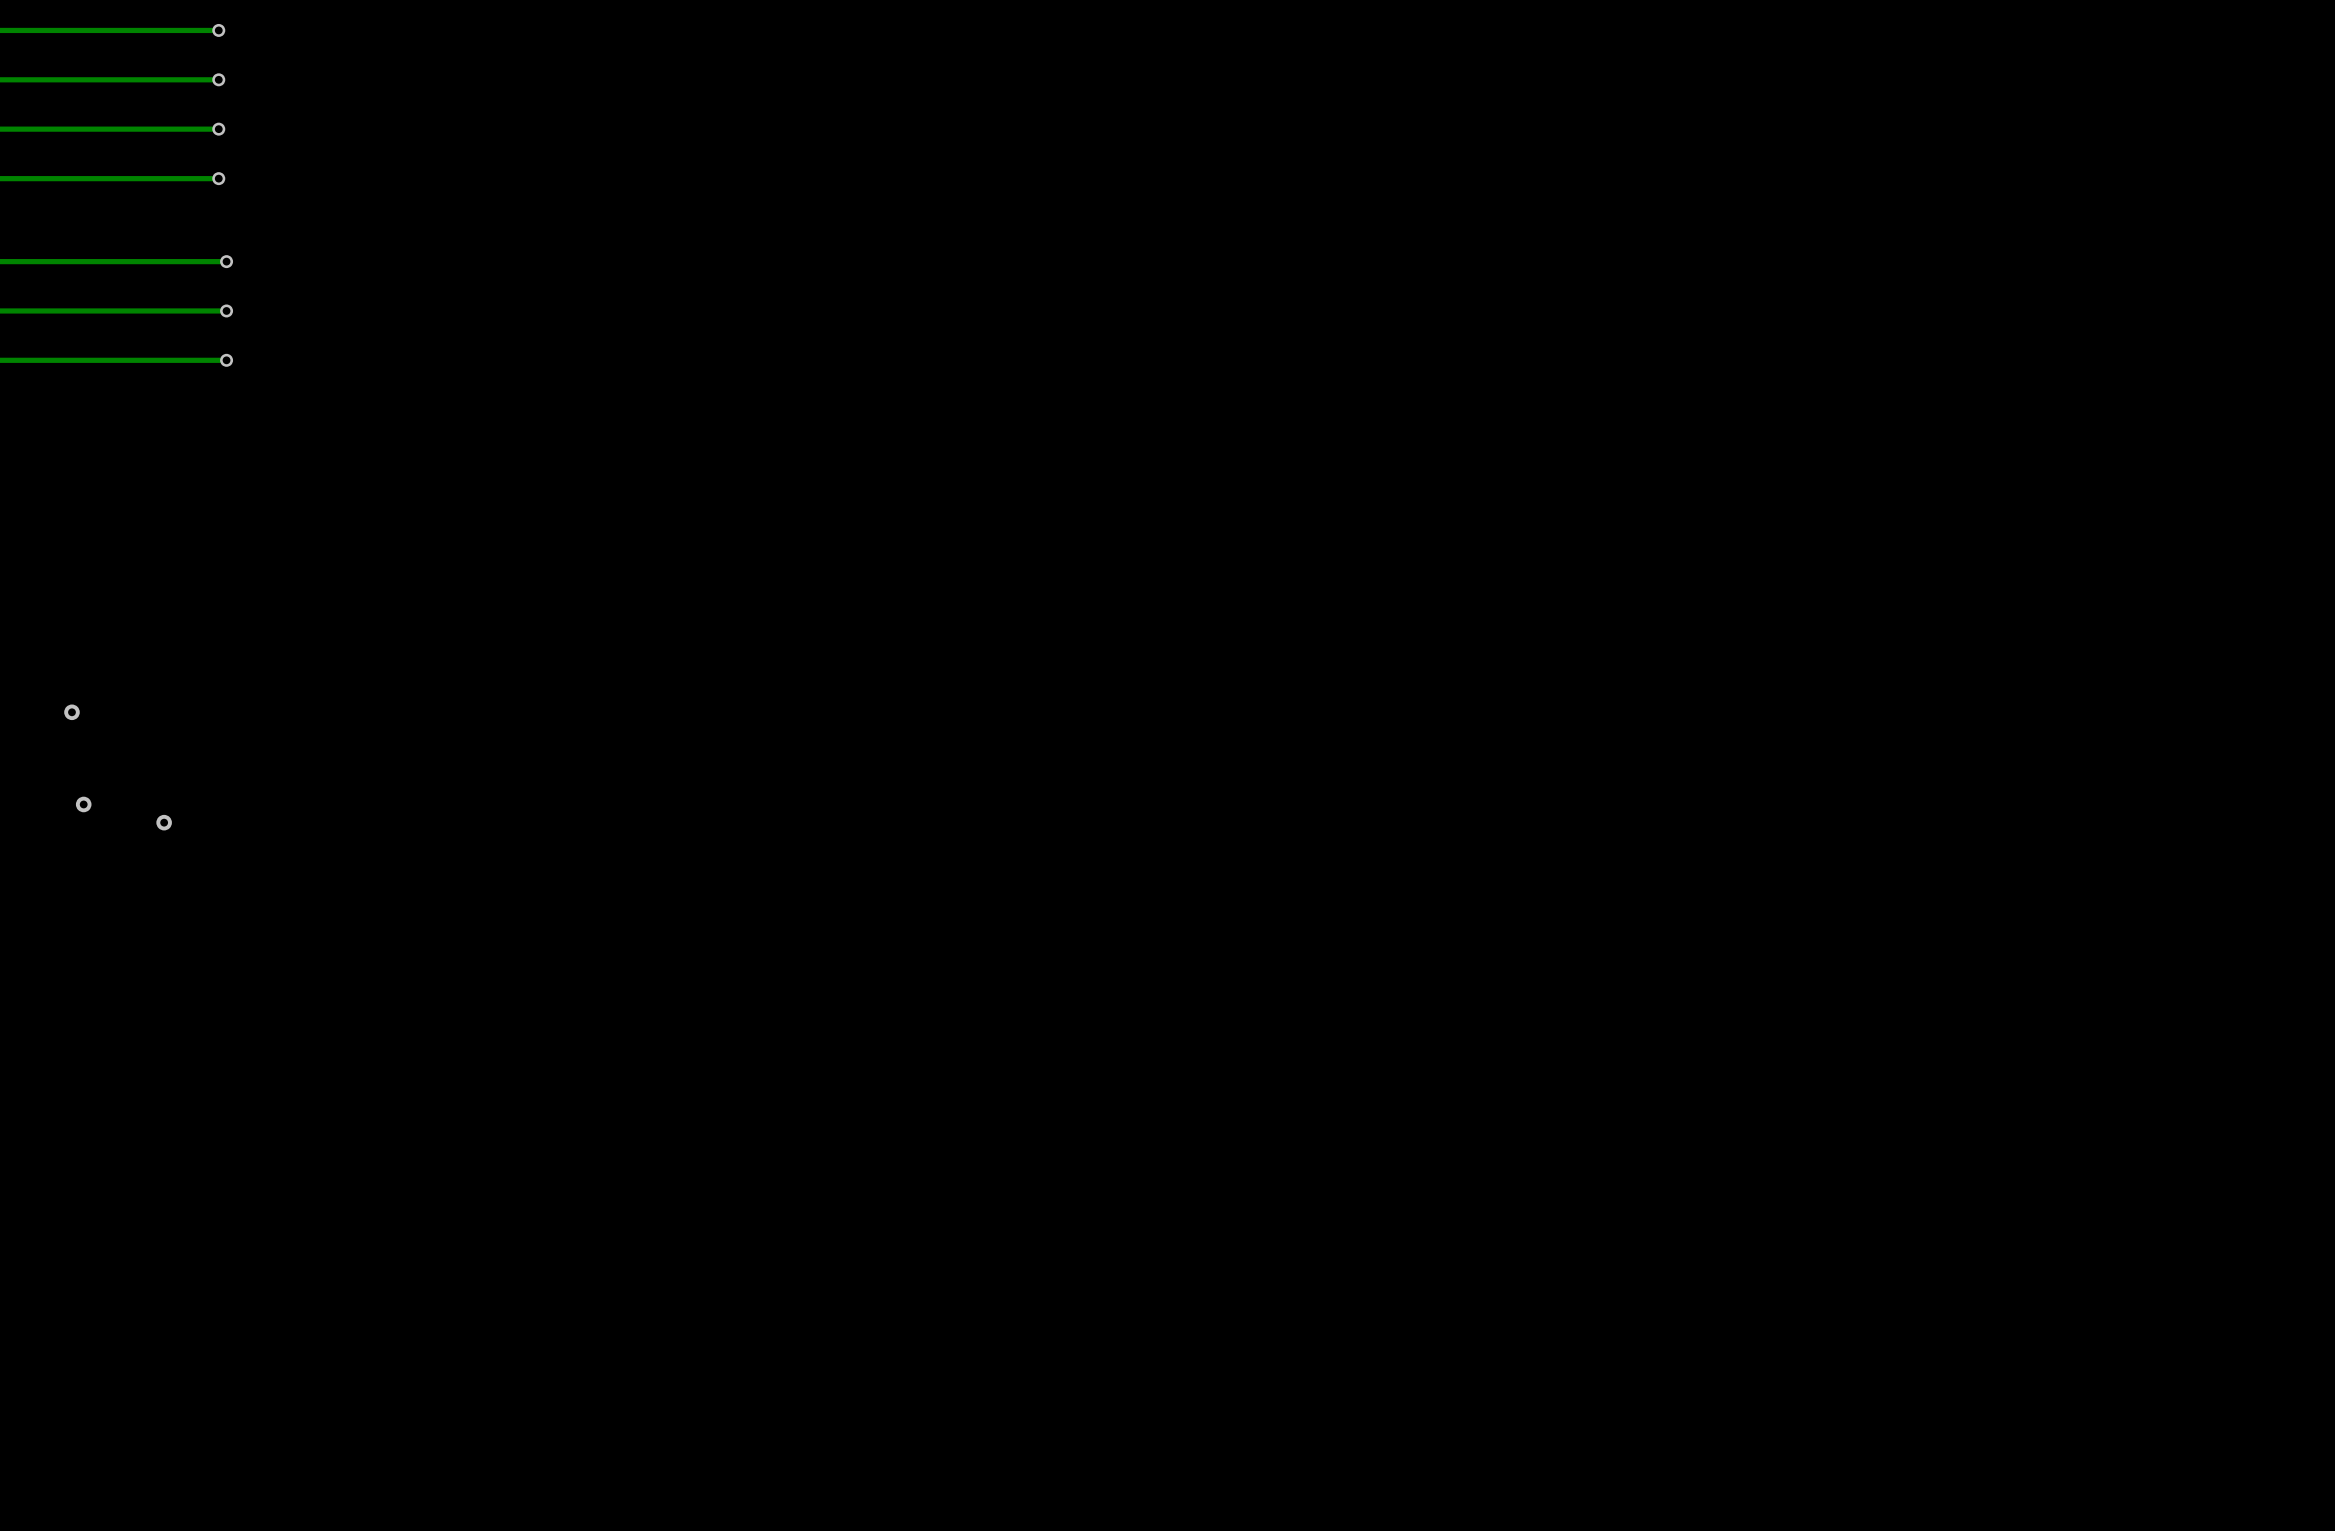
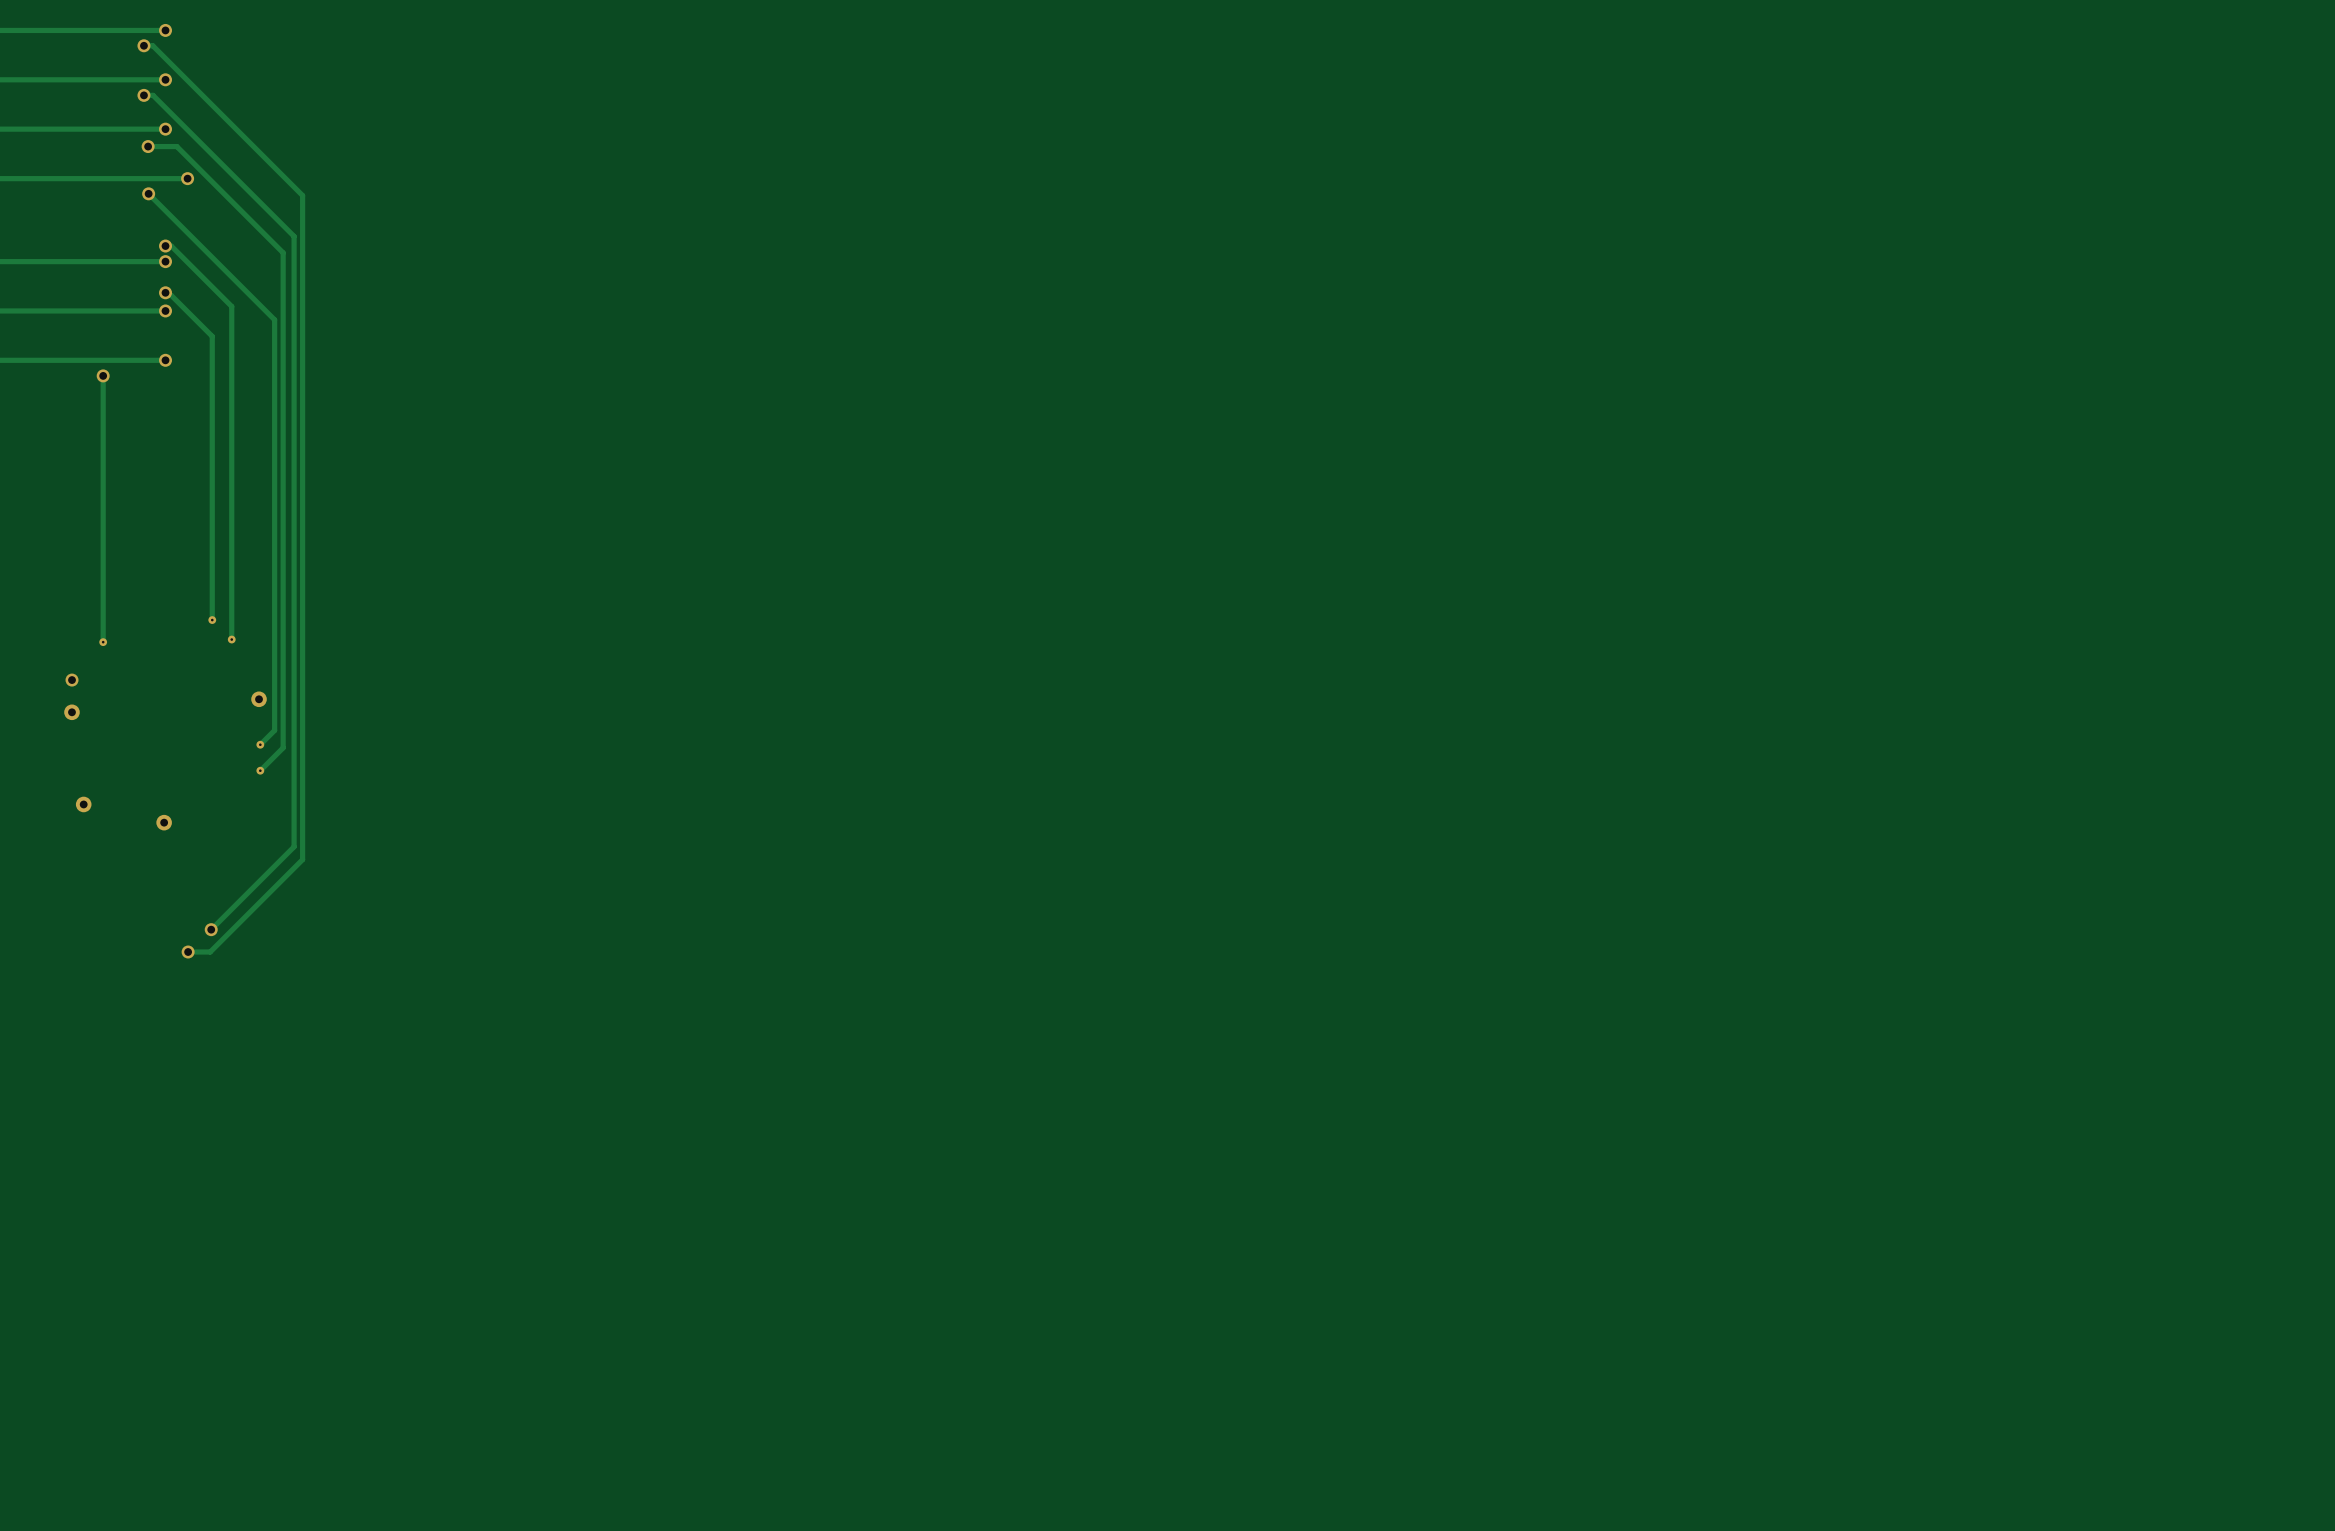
via: none -> (165, 30)
track: (218, 30) (165, 30) -> none
via: (218, 30) -> none
track: none -> (143, 45) (152, 45) (302, 195) (302, 859) (210, 952) (188, 952)
via: none -> (143, 45)
via: none -> (165, 79)
track: (218, 79) (165, 79) -> none
via: (218, 79) -> none
track: none -> (143, 95) (153, 95) (294, 236) (294, 846) (211, 929)
via: none -> (143, 95)
via: none -> (165, 129)
track: (218, 129) (165, 129) -> none
via: (218, 129) -> none
track: none -> (148, 146) (176, 146) (283, 252) (283, 747) (260, 770)
via: none -> (148, 146)
via: none -> (187, 178)
track: (218, 178) (187, 178) -> none
via: (218, 178) -> none
track: none -> (148, 193) (274, 319) (274, 730) (260, 744)
via: none -> (148, 193)
track: none -> (165, 246) (171, 246) (231, 306) (231, 639)
via: none -> (165, 246)
via: none -> (165, 261)
track: (226, 261) (165, 261) -> none
via: (226, 261) -> none
track: none -> (165, 292) (165, 295) (171, 295) (212, 336) (212, 620)
via: none -> (165, 292)
via: none -> (165, 310)
track: (226, 310) (165, 310) -> none
via: (226, 310) -> none
via: none -> (165, 360)
track: (226, 360) (165, 360) -> none
via: (226, 360) -> none
track: none -> (103, 375) (103, 642)
via: none -> (103, 375)
via: none -> (212, 620)
via: none -> (231, 639)
via: none -> (103, 642)
via: none -> (72, 680)
via: none -> (259, 699)
via: none -> (260, 744)
via: none -> (260, 770)
via: none -> (211, 929)
via: none -> (188, 952)

